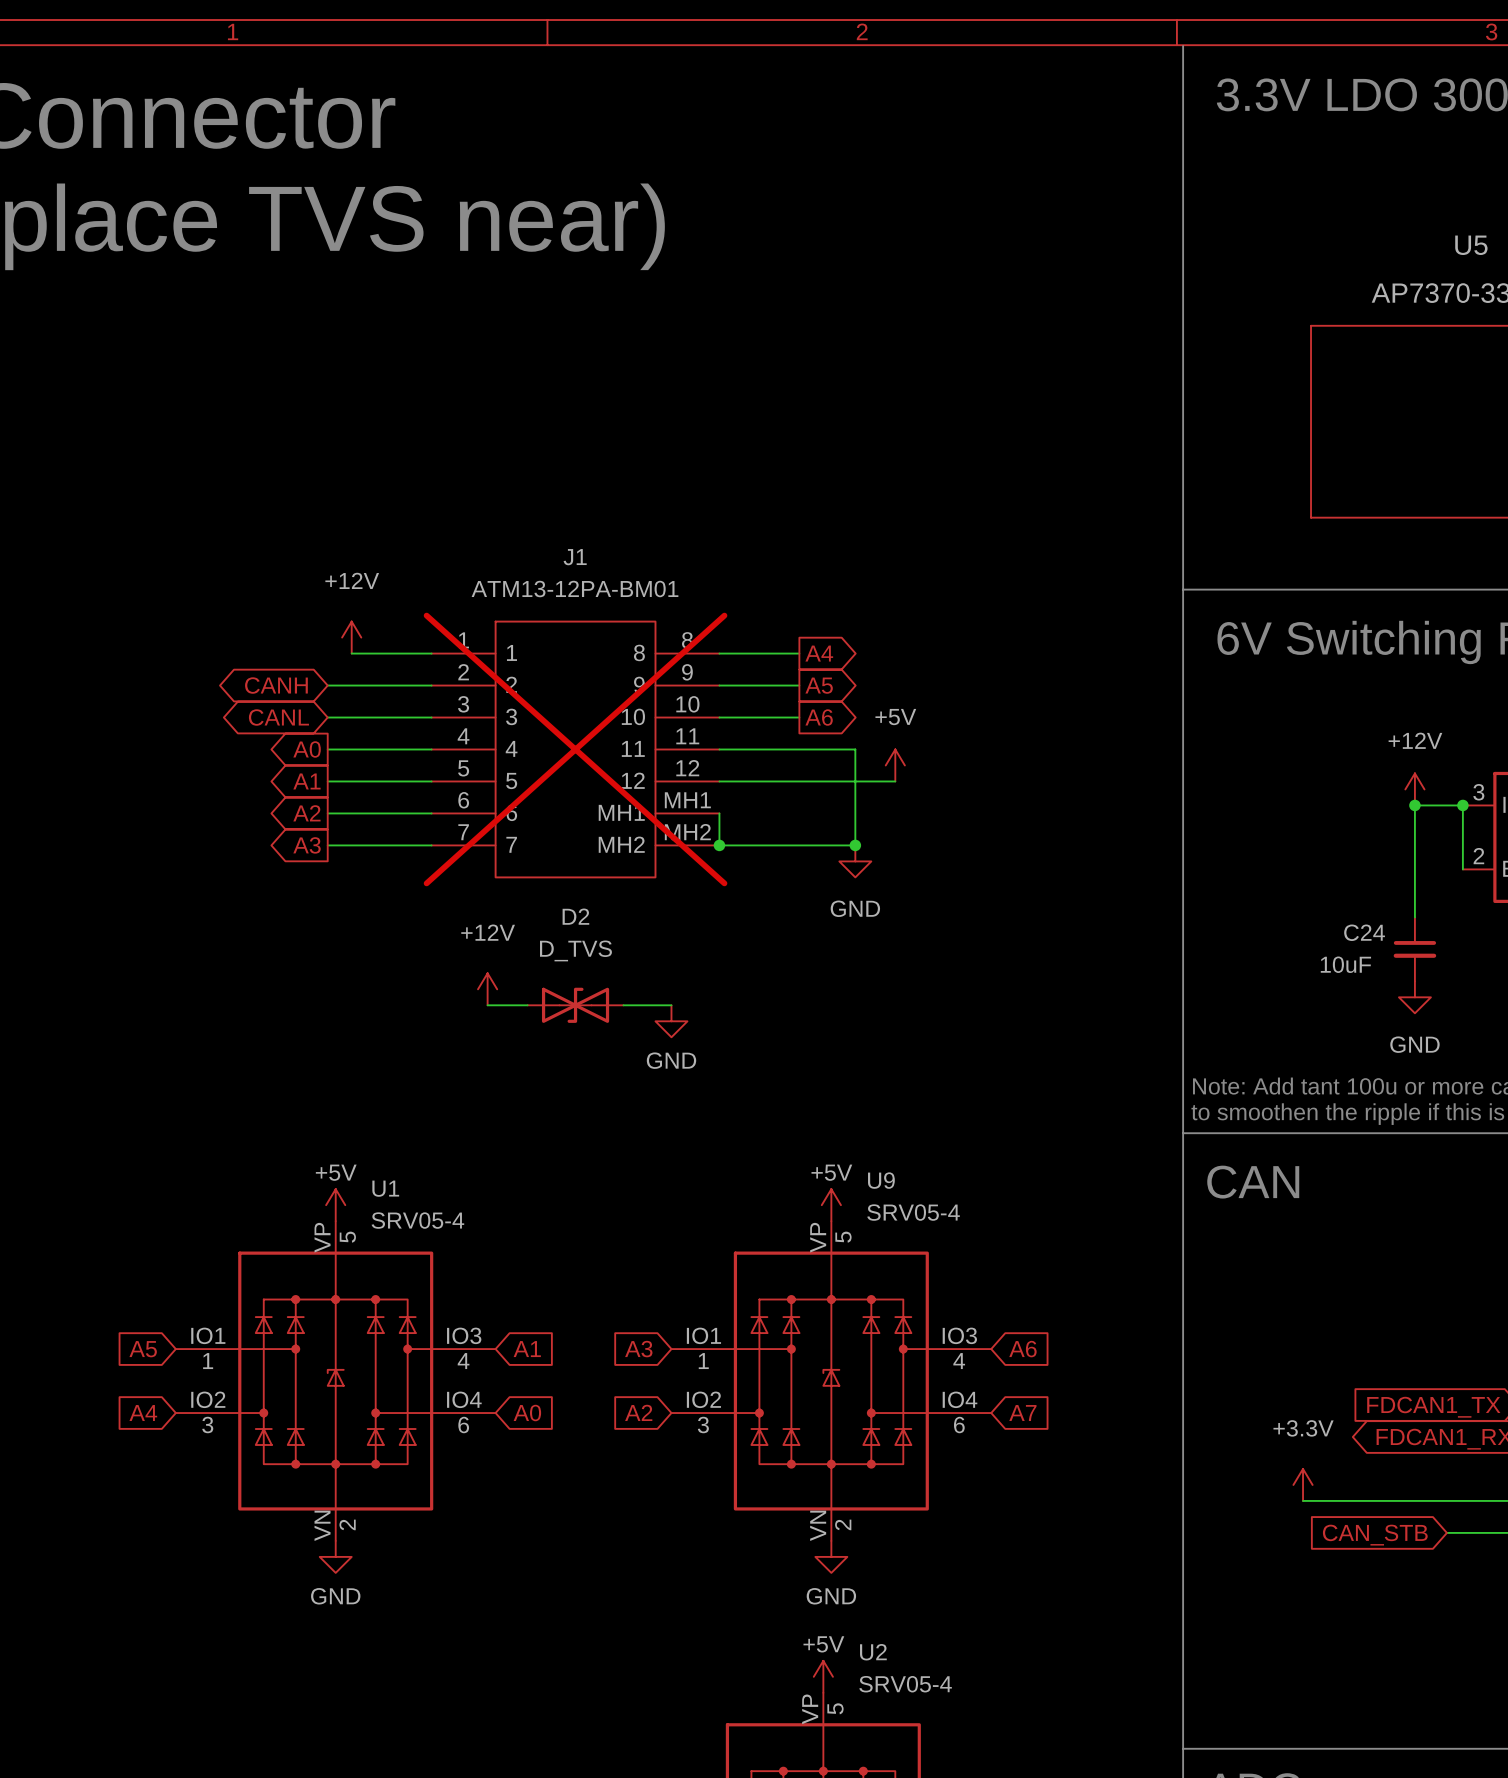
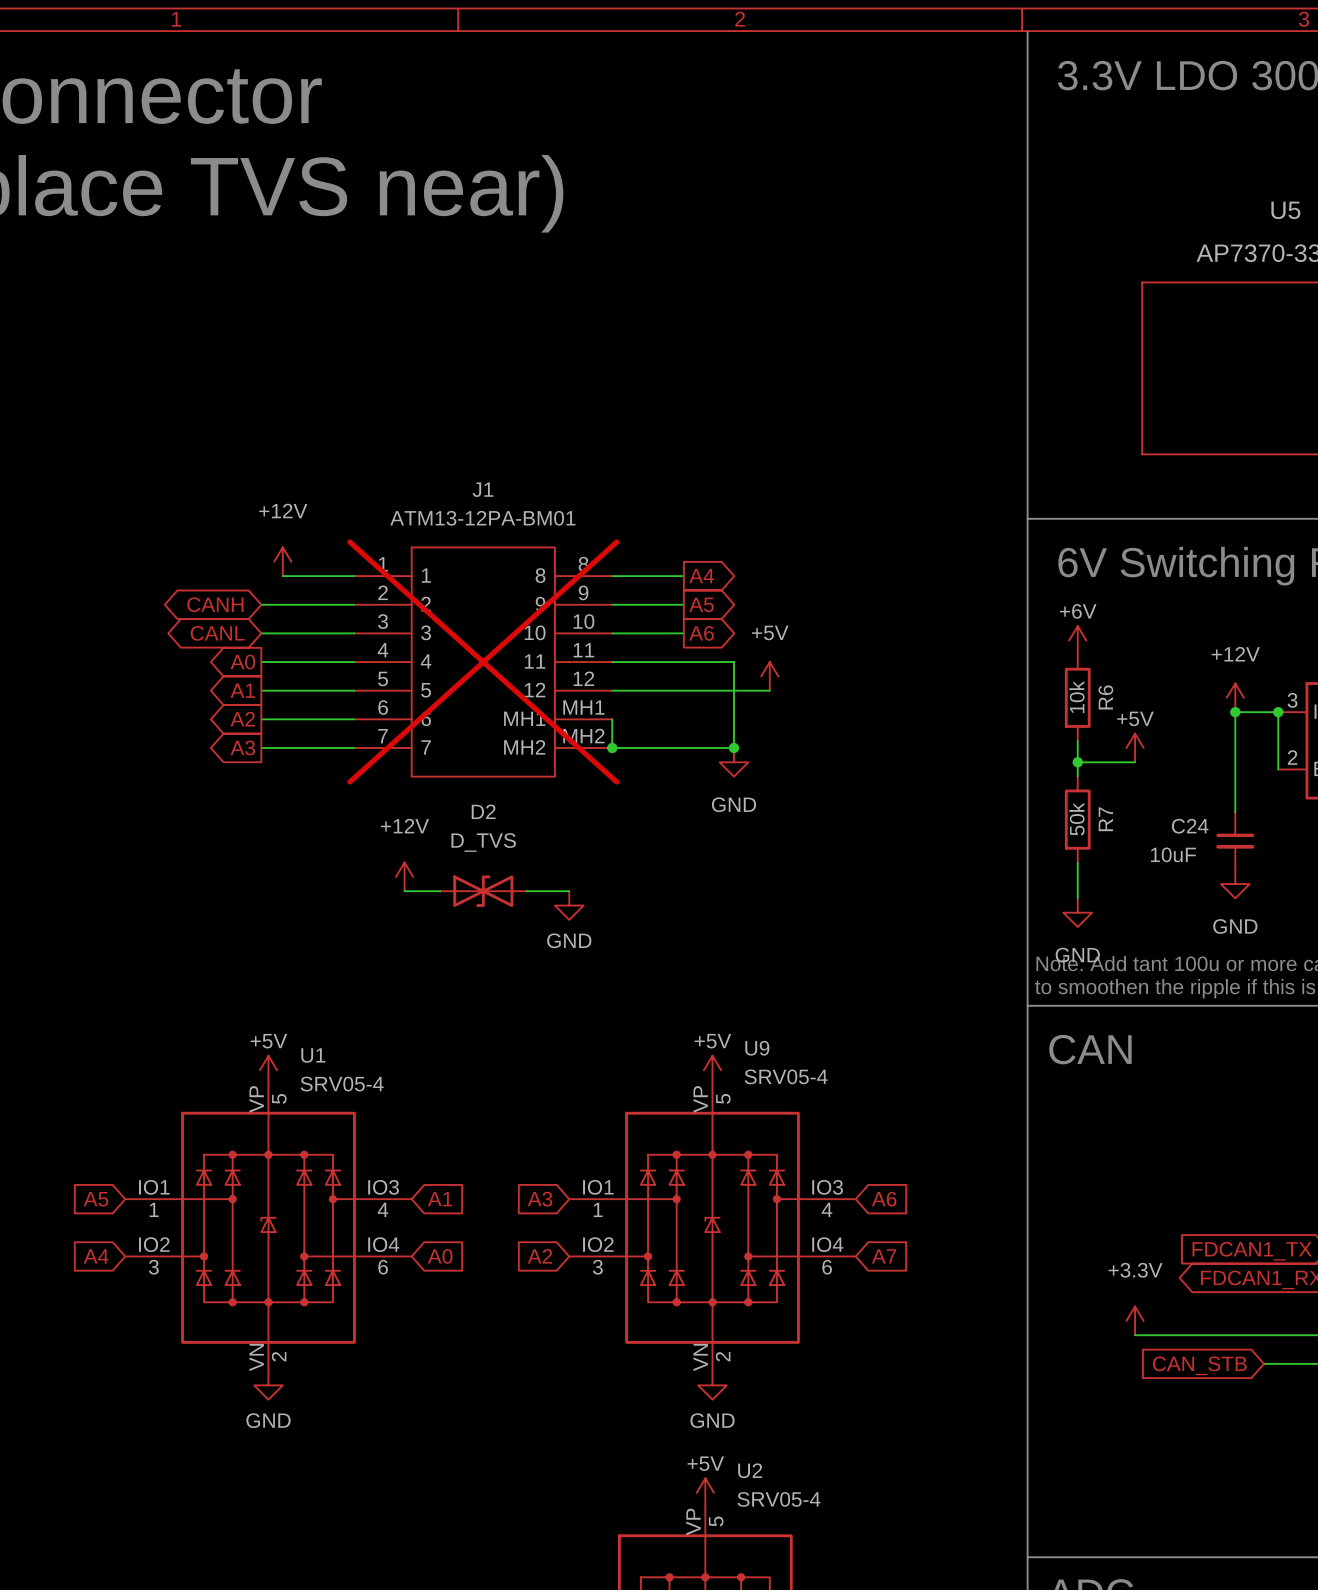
power symbol: none -> +6V (1077, 640)
R6: none -> 10k (1077, 697)
wire: none -> (1077, 740) (1077, 776)
power symbol: none -> +5V (1135, 747)
wire: none -> (1077, 762) (1135, 762)
junction: none -> (1077, 762)
R7: none -> 50k (1077, 819)
wire: none -> (1077, 862) (1077, 898)
power symbol: none -> GND (1077, 912)

